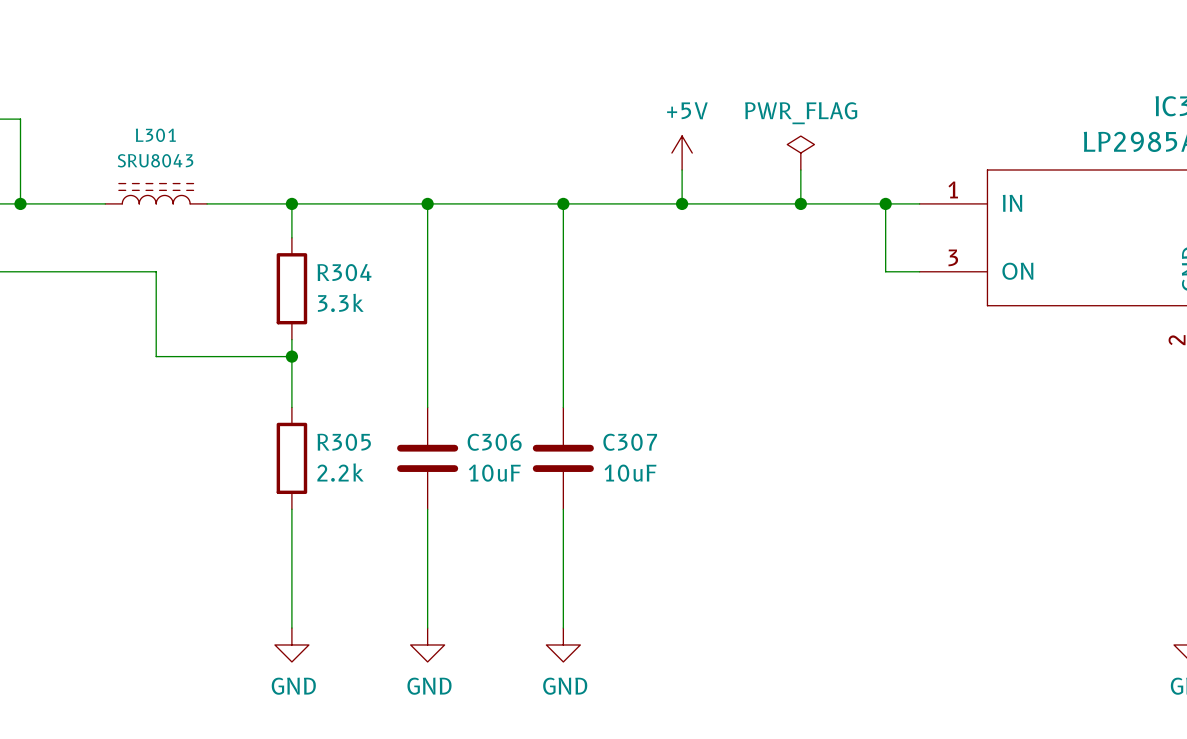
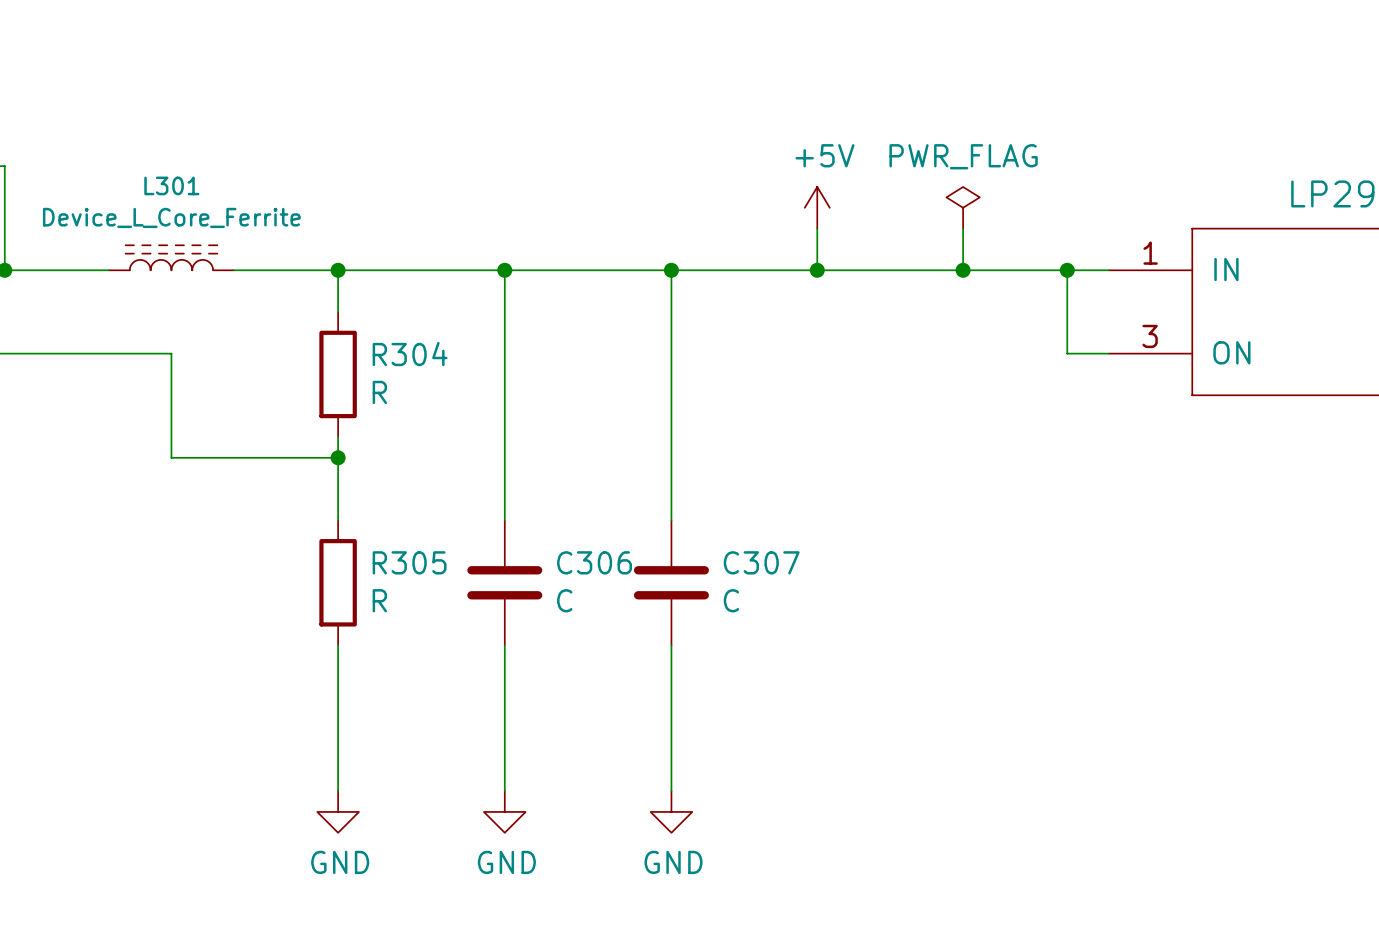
L301 value: SRU8043 (155, 160) -> Device_L_Core_Ferrite (171, 217)
R304 value: 3.3k (340, 302) -> R (379, 392)
R305 value: 2.2k (340, 472) -> R (379, 600)
C306 value: 10uF (494, 473) -> C (564, 600)
C307 value: 10uF (630, 473) -> C (731, 600)

